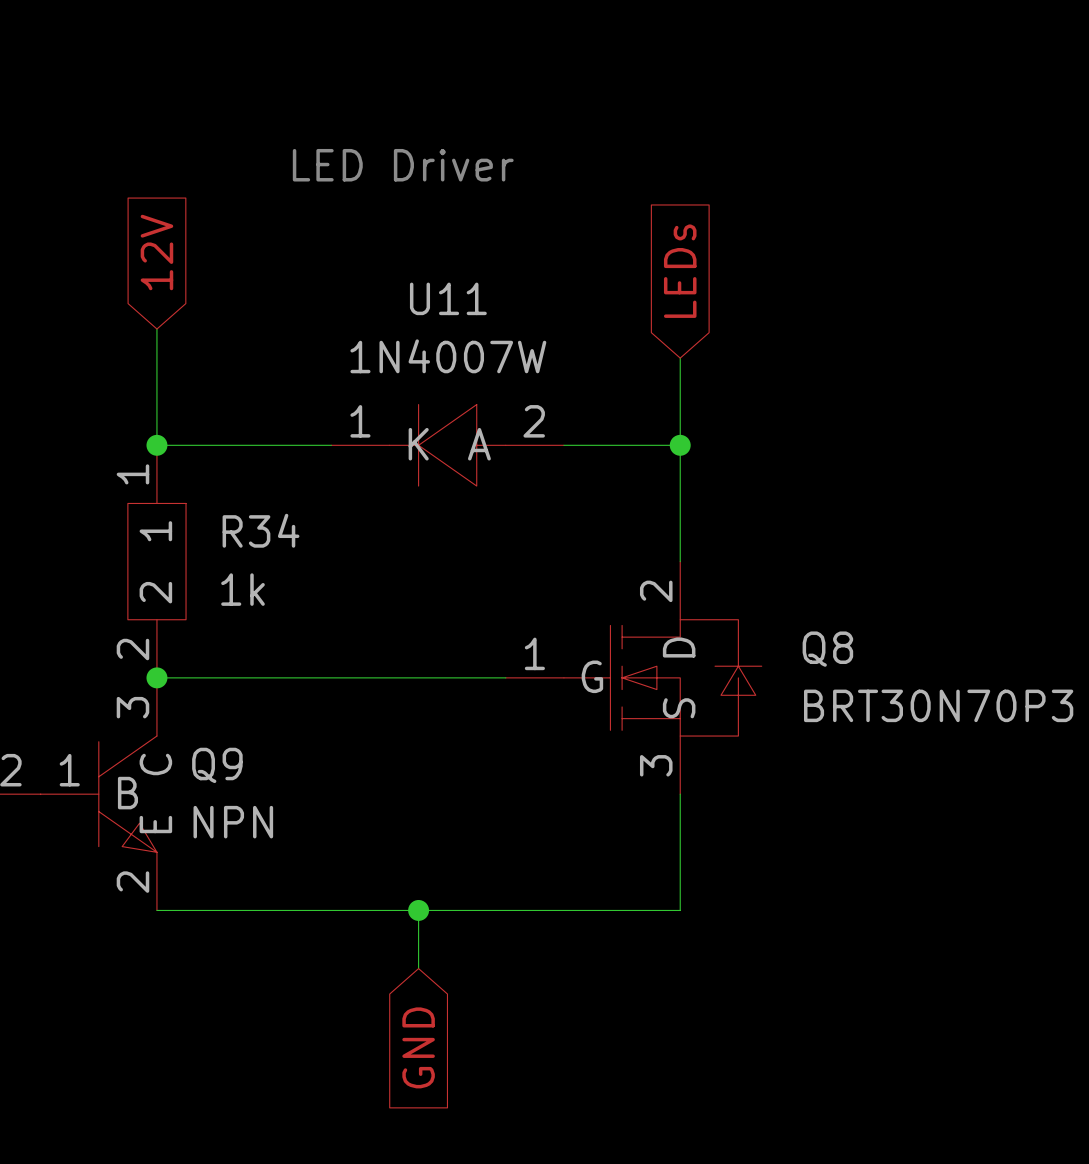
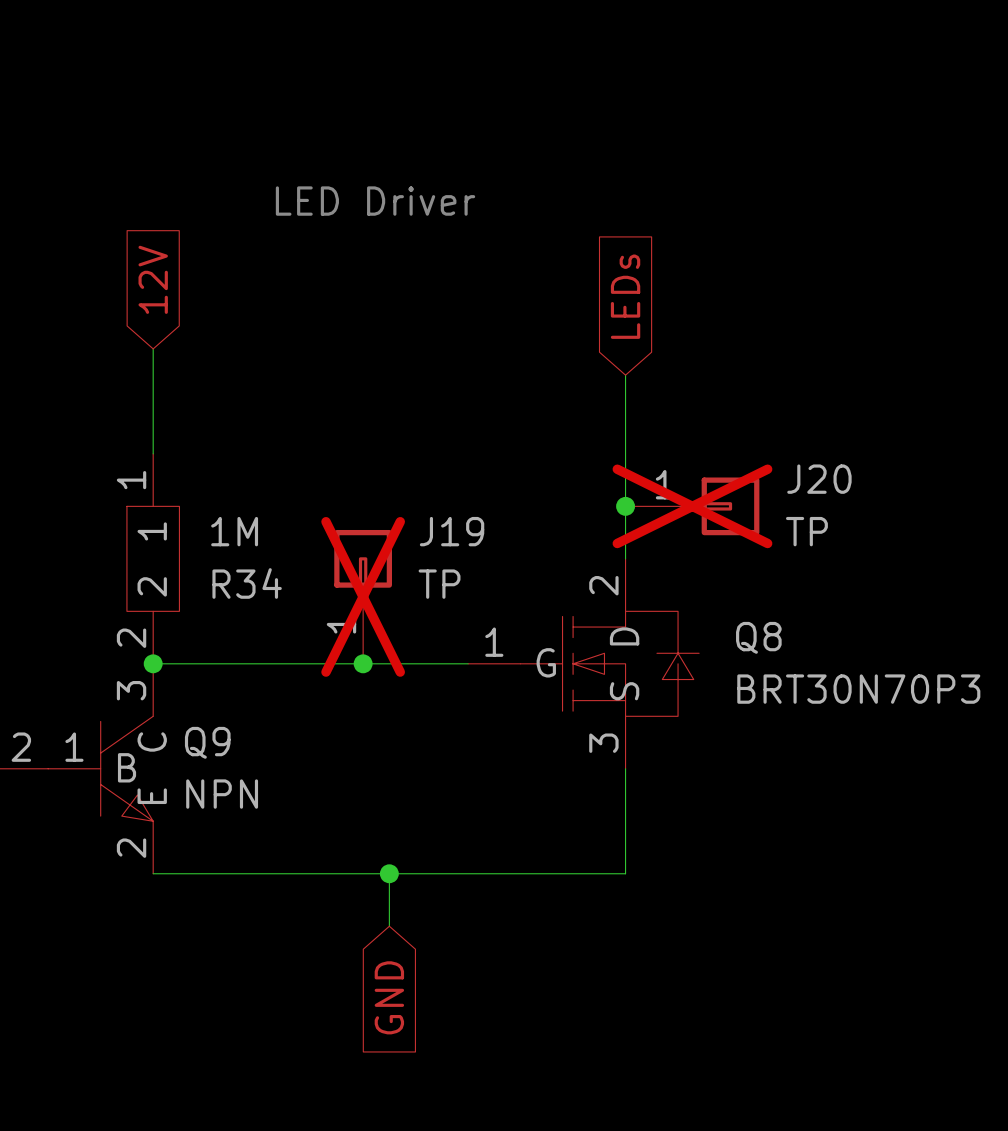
wire: (156, 445) (331, 445) -> none
junction: (156, 445) -> none
U11: 1N4007W (447, 445) -> none
wire: (563, 445) (680, 445) -> none
junction position: (680, 445) -> (625, 506)
J20: none -> TP (692, 506)
R34 name position: R34 (261, 530) -> R34 (247, 583)
R34 value: 1k (243, 589) -> 1M (234, 531)
J19: none -> TP (363, 596)
junction: none -> (363, 663)

